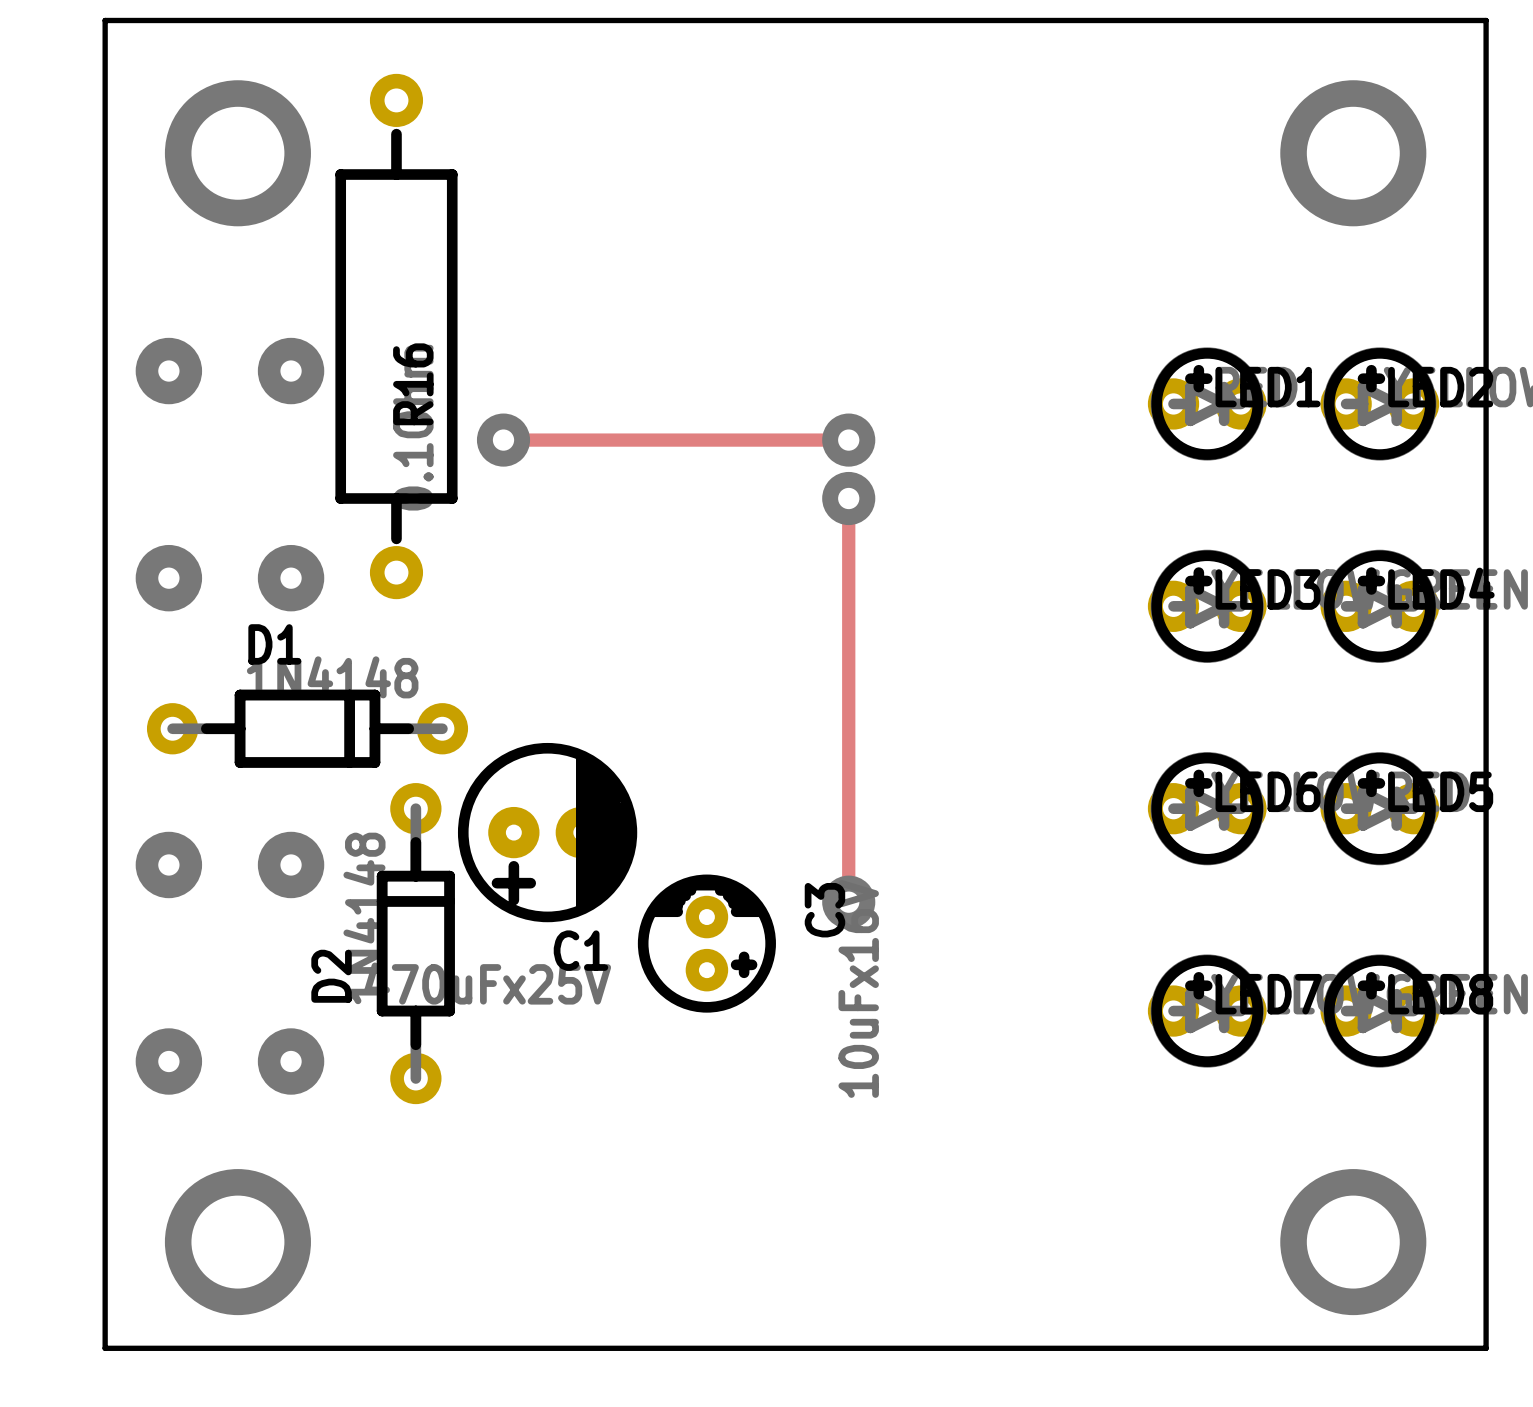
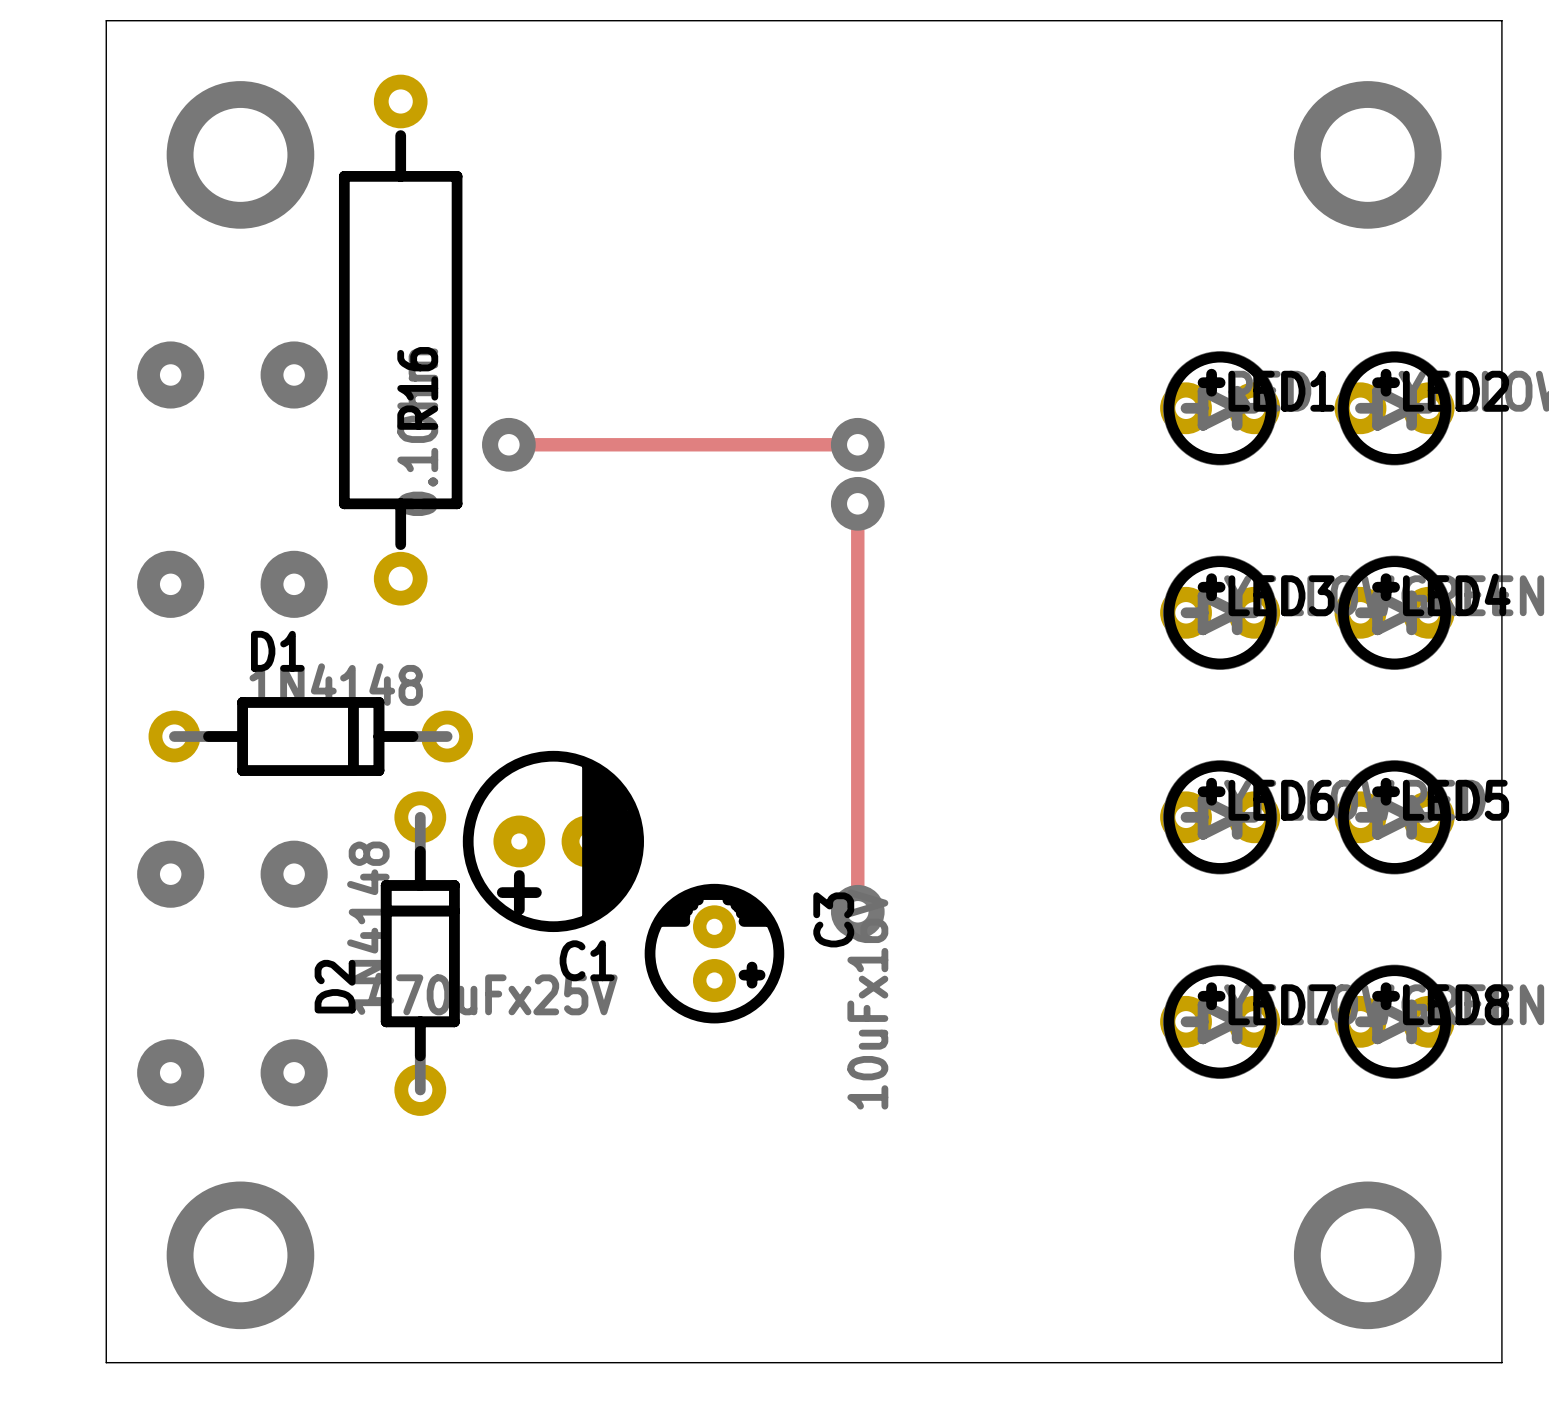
board edge width: thick (105, 20) (1486, 20) (1486, 1348) (105, 1348) (105, 20) -> thin (106, 20) (1501, 20) (1501, 1362) (106, 1362) (106, 20)

